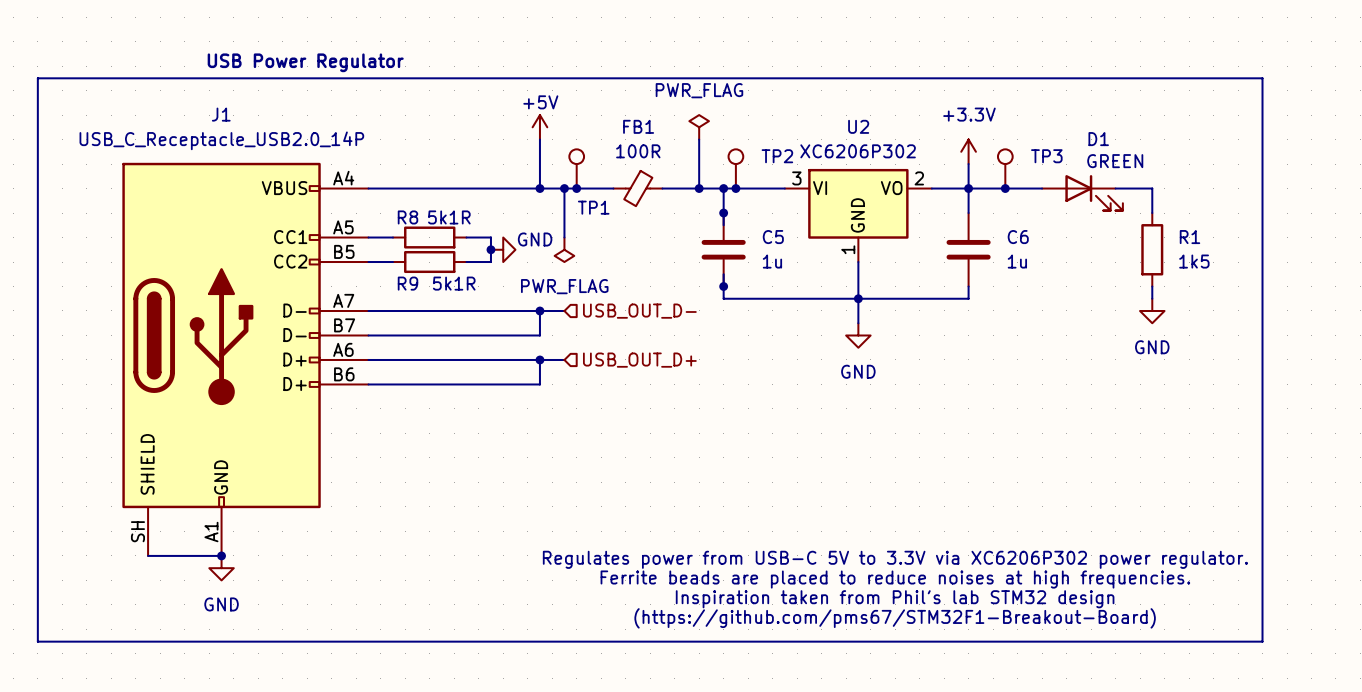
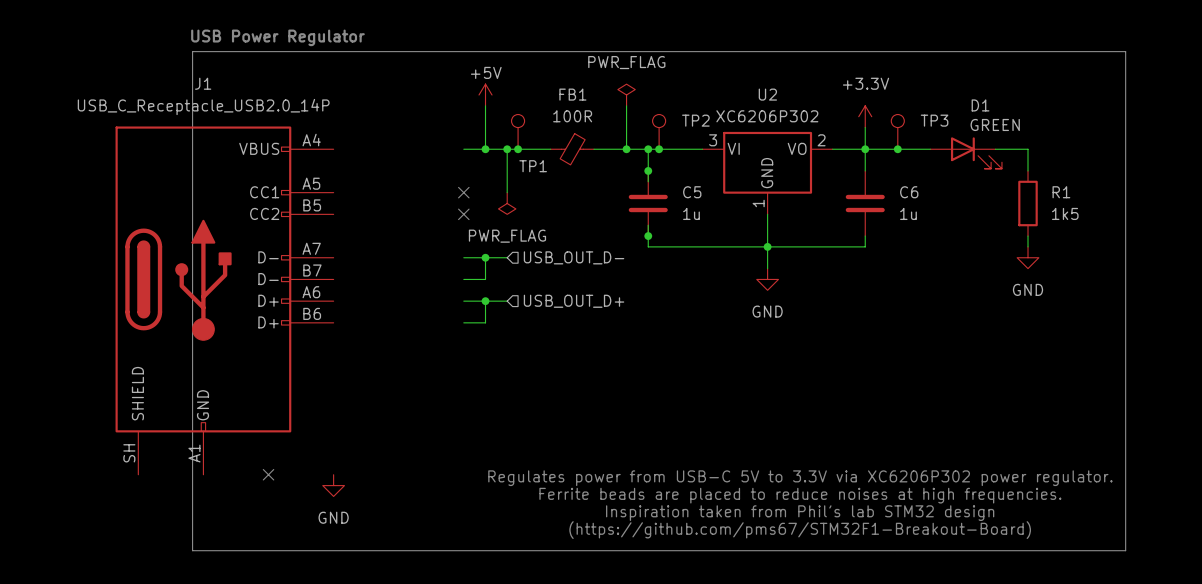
line: (209, 78) (37, 78) (37, 641) (209, 641) -> (192, 51) (192, 550)
wire: (368, 188) (515, 188) -> none
wire: (368, 237) (393, 237) -> none
R8: 5k1R (429, 237) -> none
wire: (466, 237) (490, 237) (490, 262) (466, 262) -> none
no-connect mark: none -> (463, 192)
junction: (490, 249) -> none
power symbol: GND (503, 249) -> none
wire: (368, 262) (393, 262) -> none
R9: 5k1R (429, 262) -> none
no-connect mark: none -> (463, 214)
wire: (368, 310) (515, 310) -> none
wire: (368, 335) (515, 335) -> none
wire: (368, 359) (515, 359) -> none
wire: (368, 384) (515, 384) -> none
wire: (148, 555) (221, 555) -> none
junction: (221, 555) -> none
no-connect mark: none -> (268, 474)
power symbol position: GND (221, 568) -> GND (333, 485)

